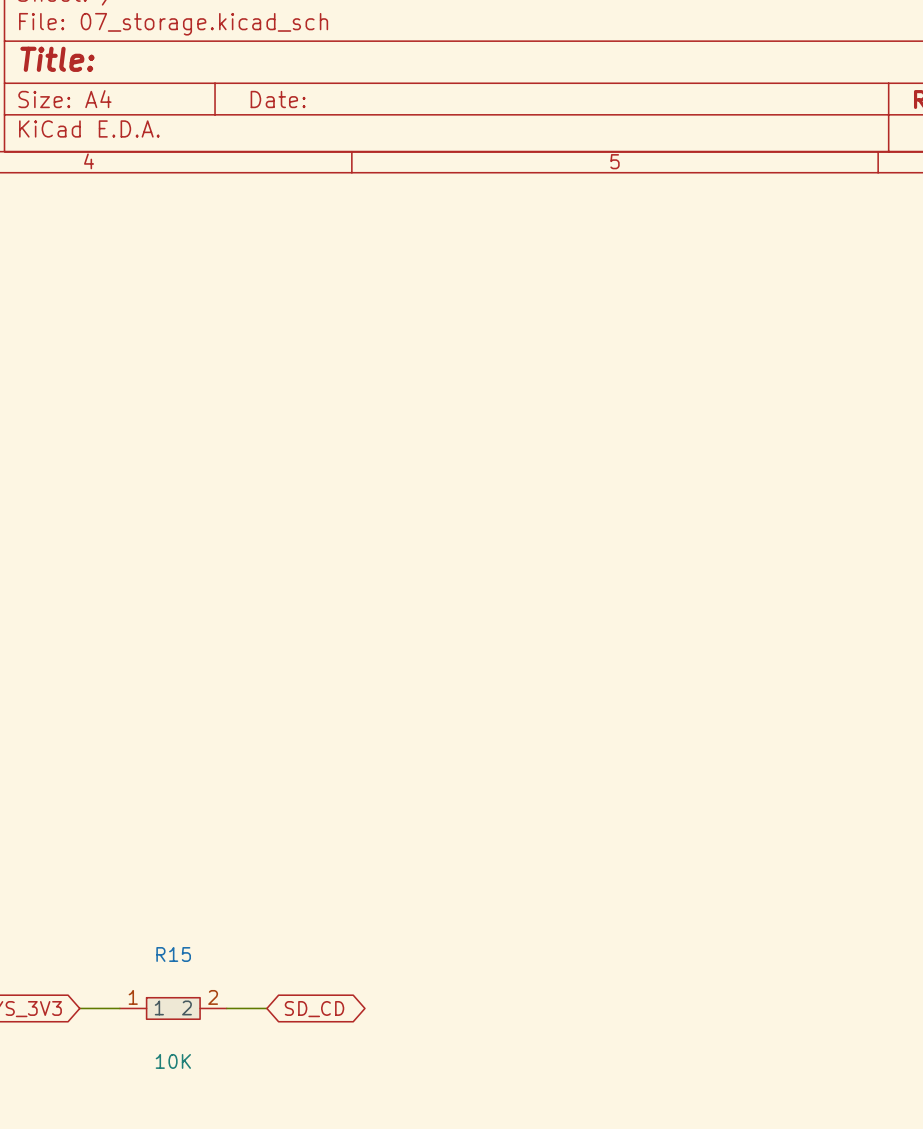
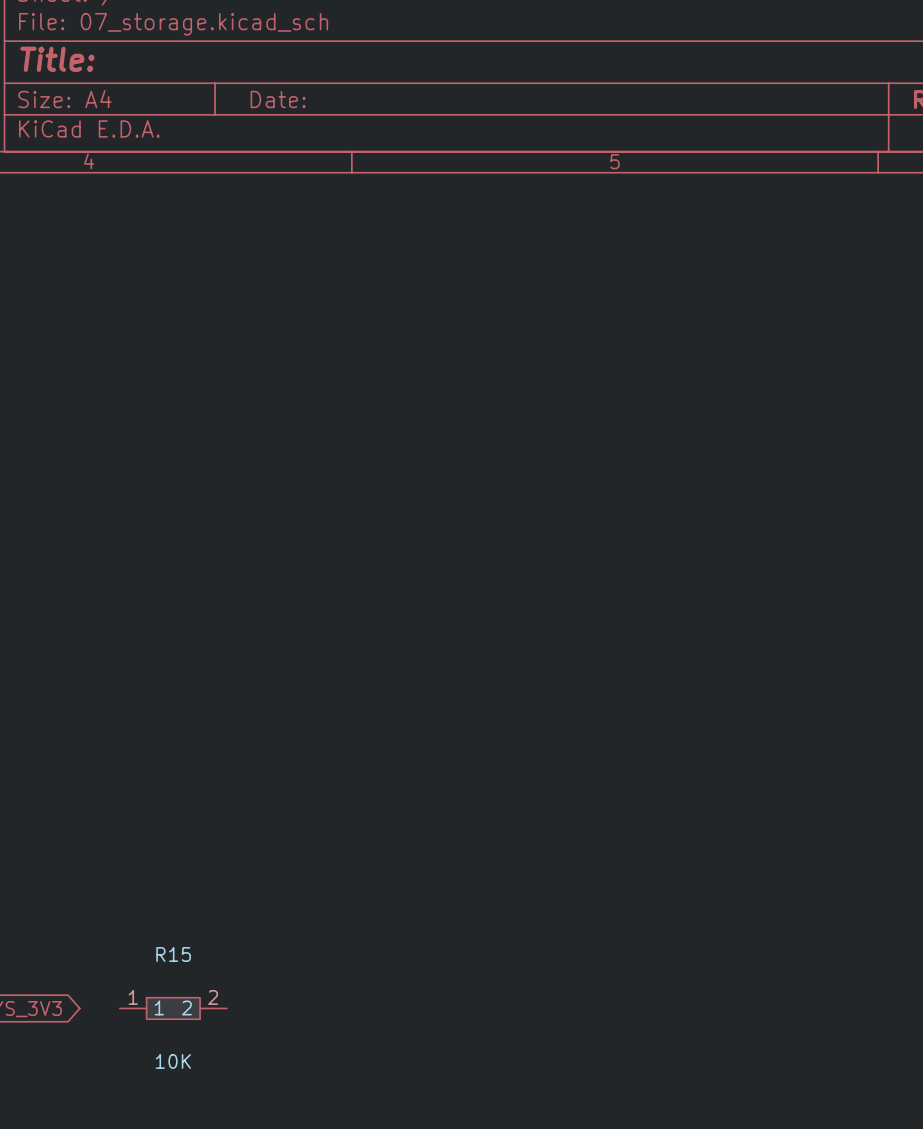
wire: (79, 1008) (119, 1008) -> none
wire: (226, 1008) (266, 1008) -> none
global label: SD_CD (314, 1009) -> none

